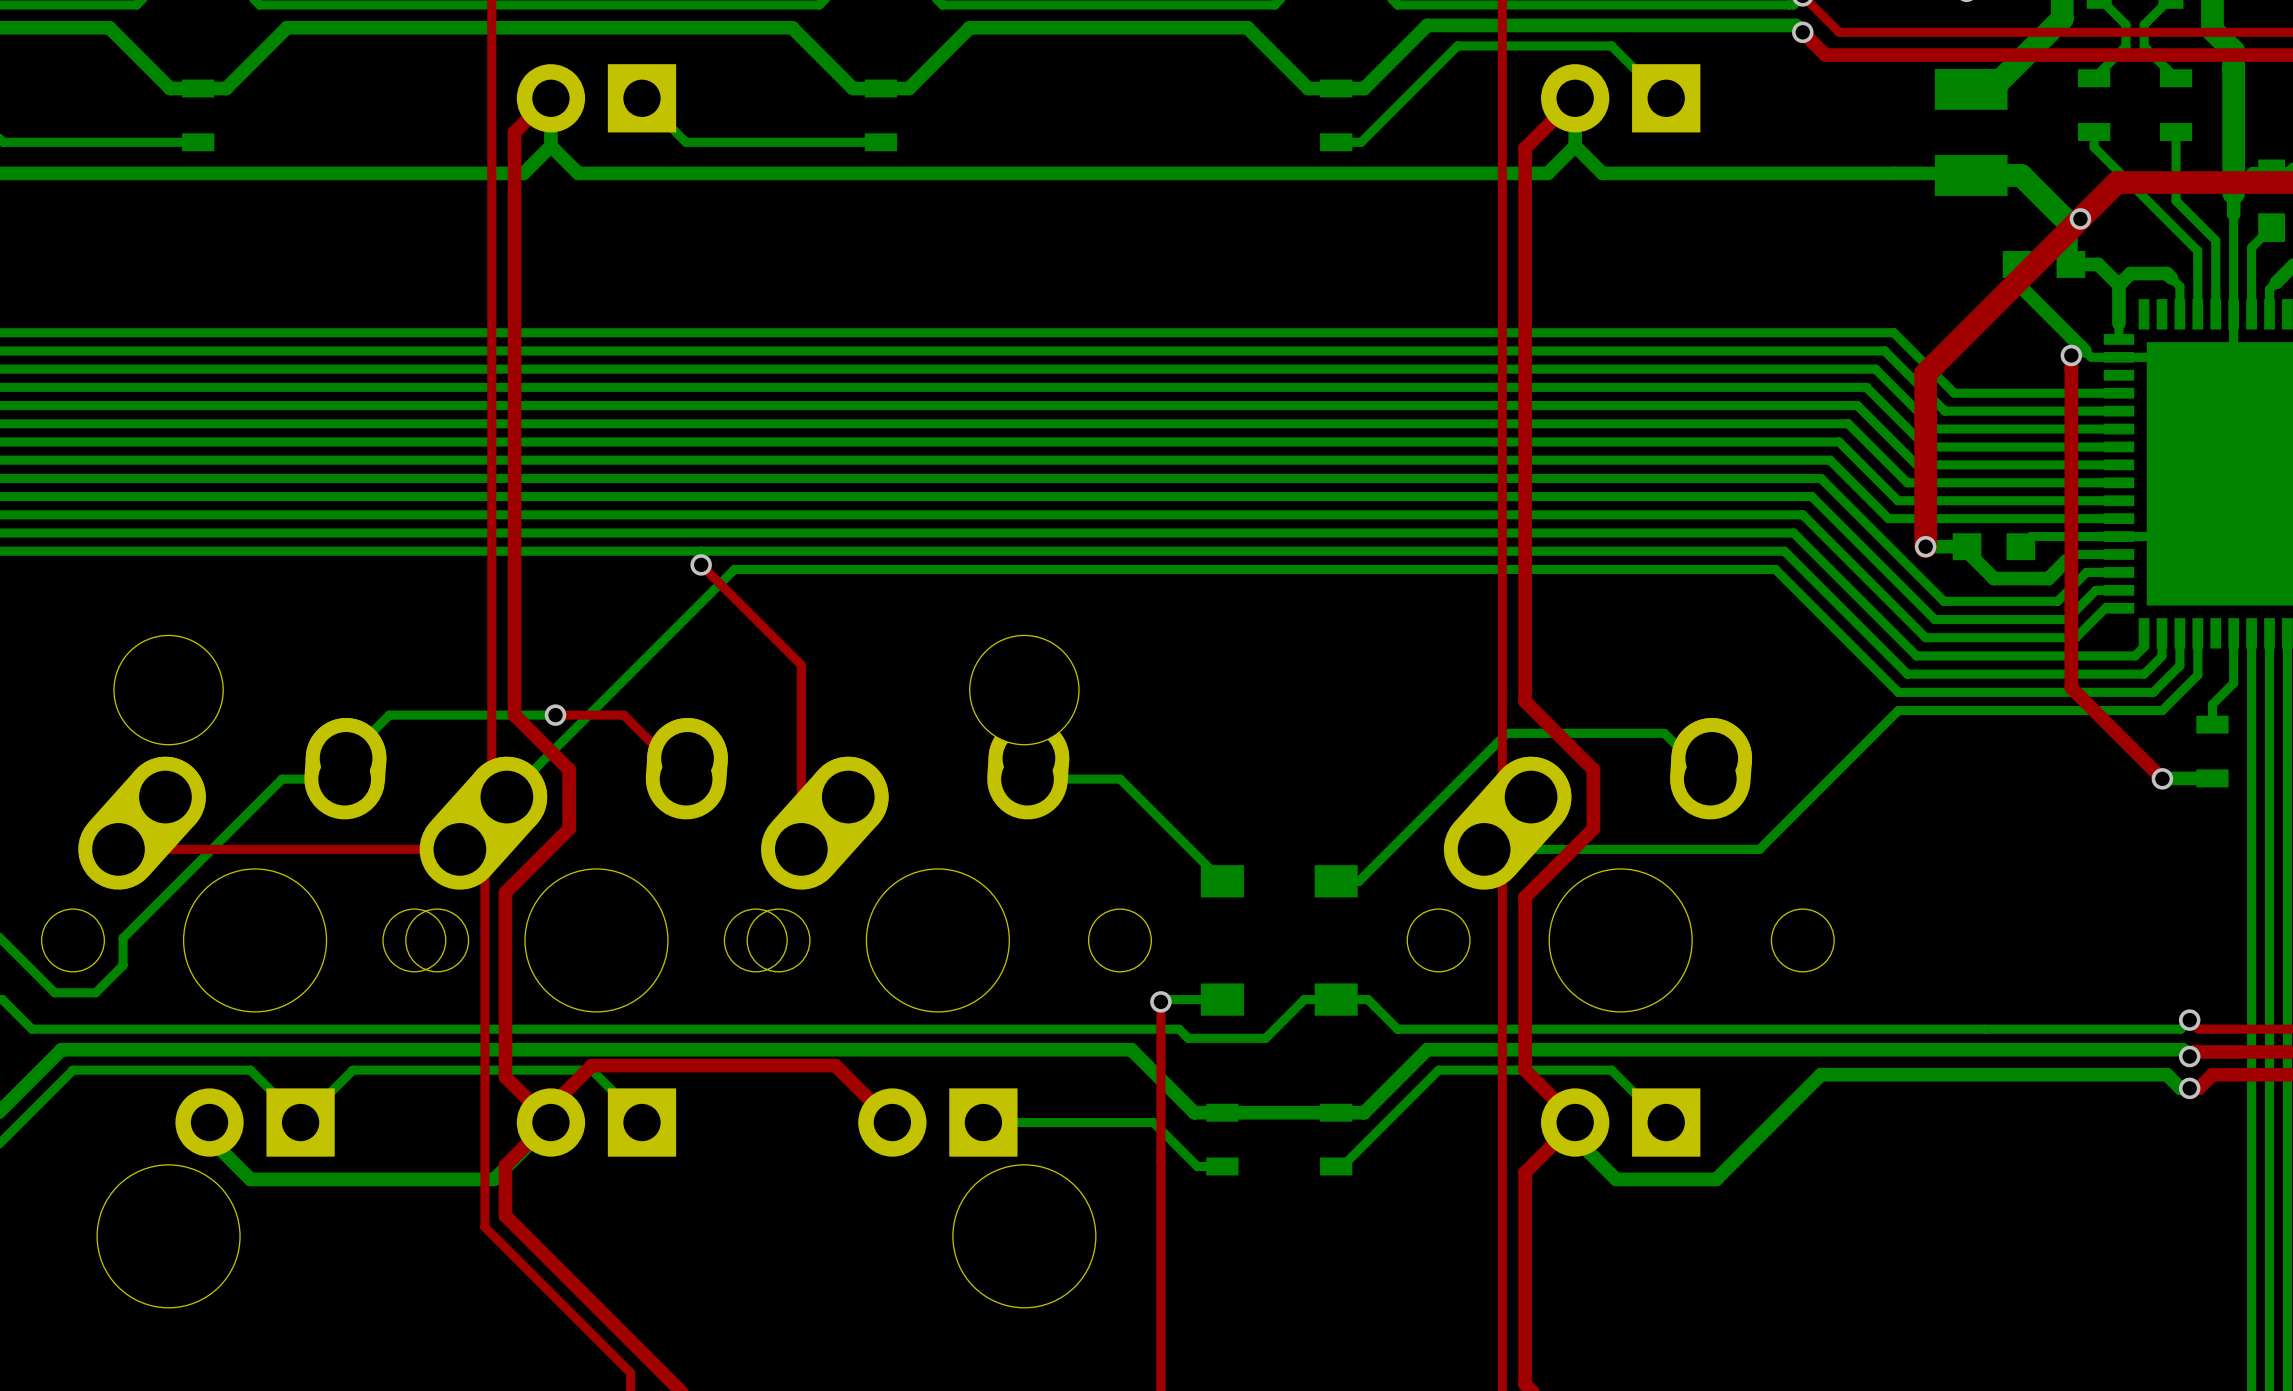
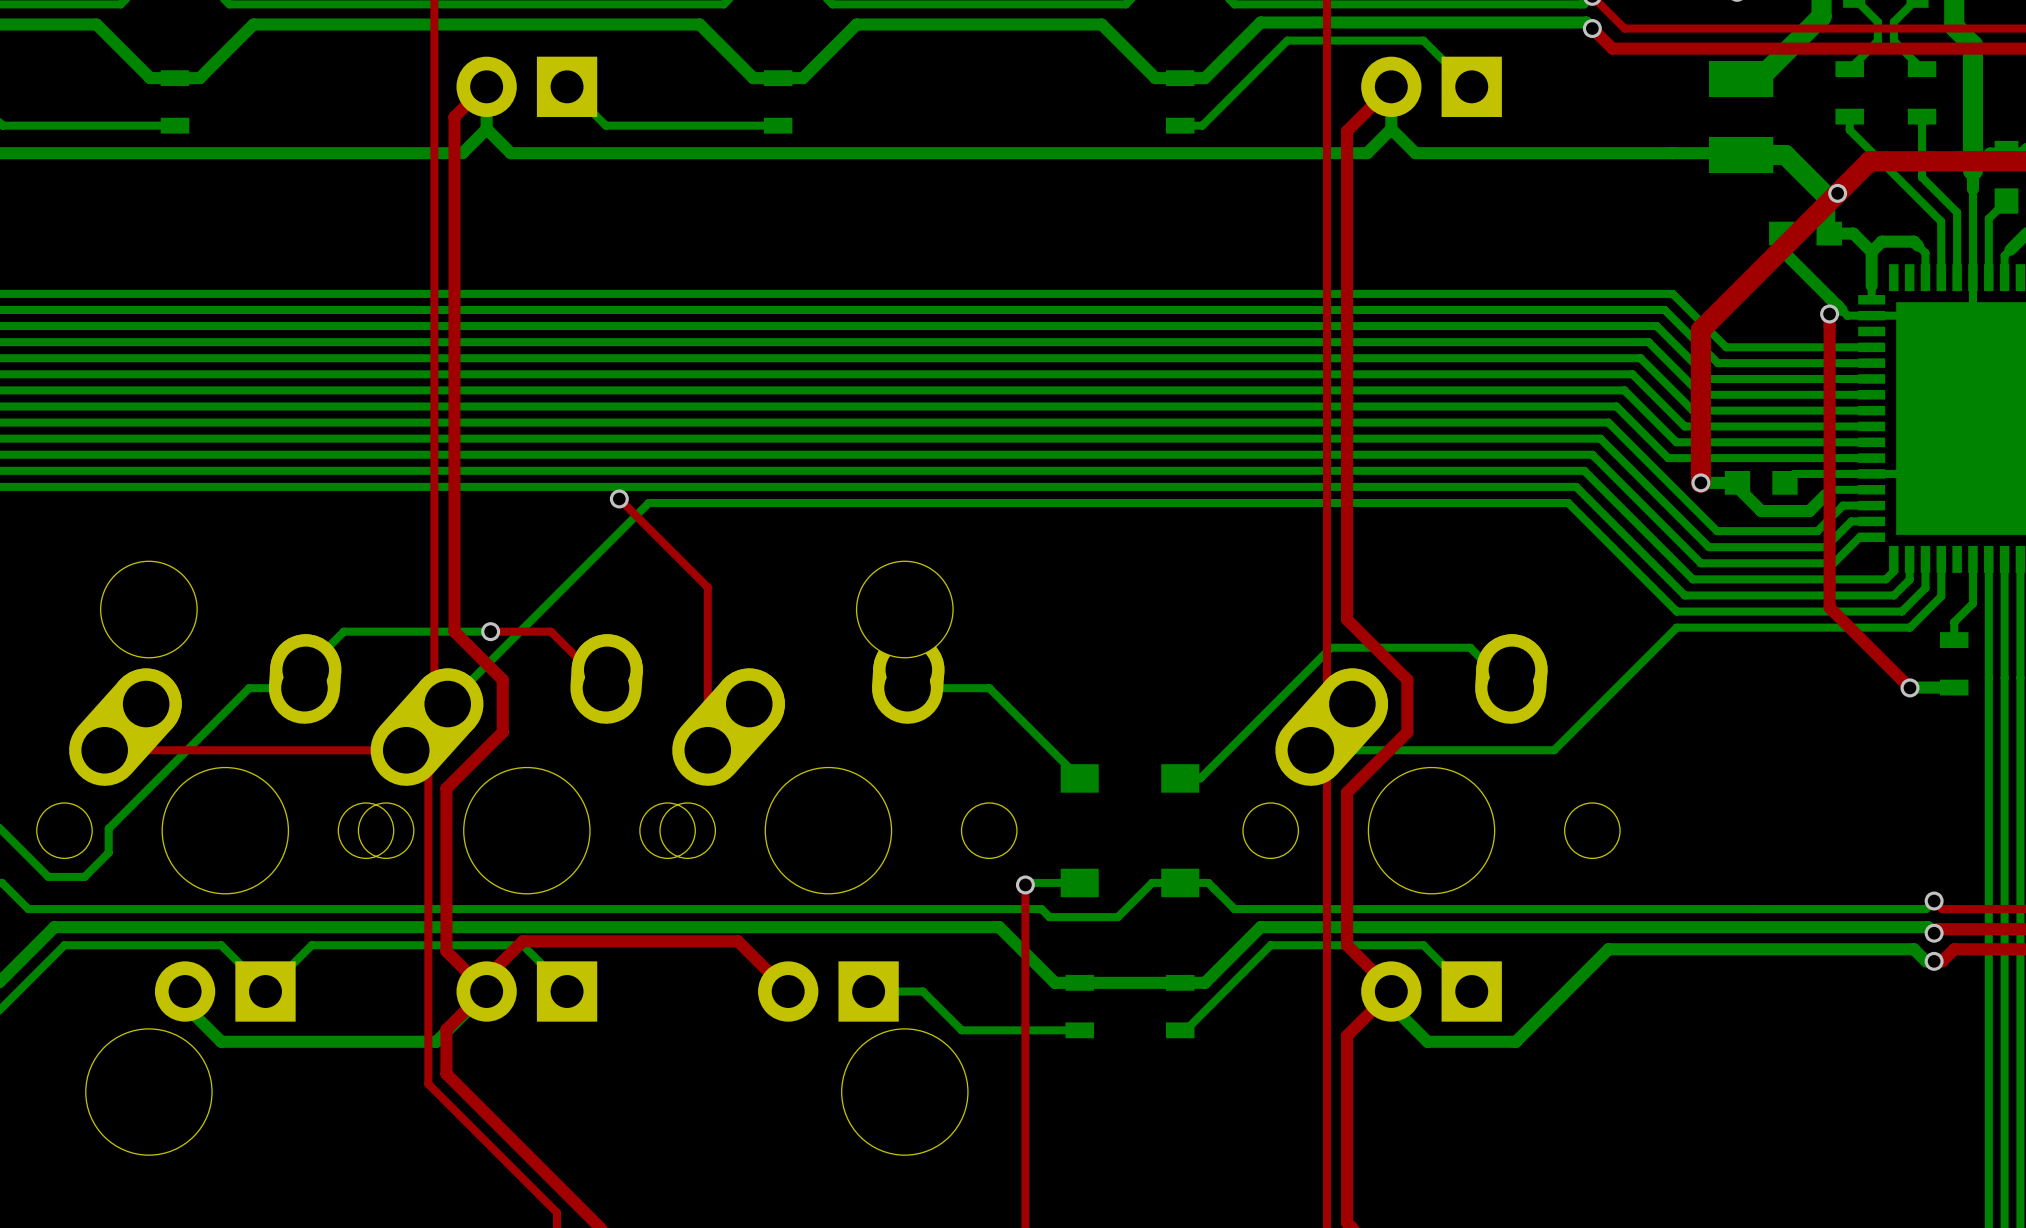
bottom track: (1044, 1122) (1153, 1122) (1197, 1166) -> (922, 991) (961, 1030) (1057, 1030)

